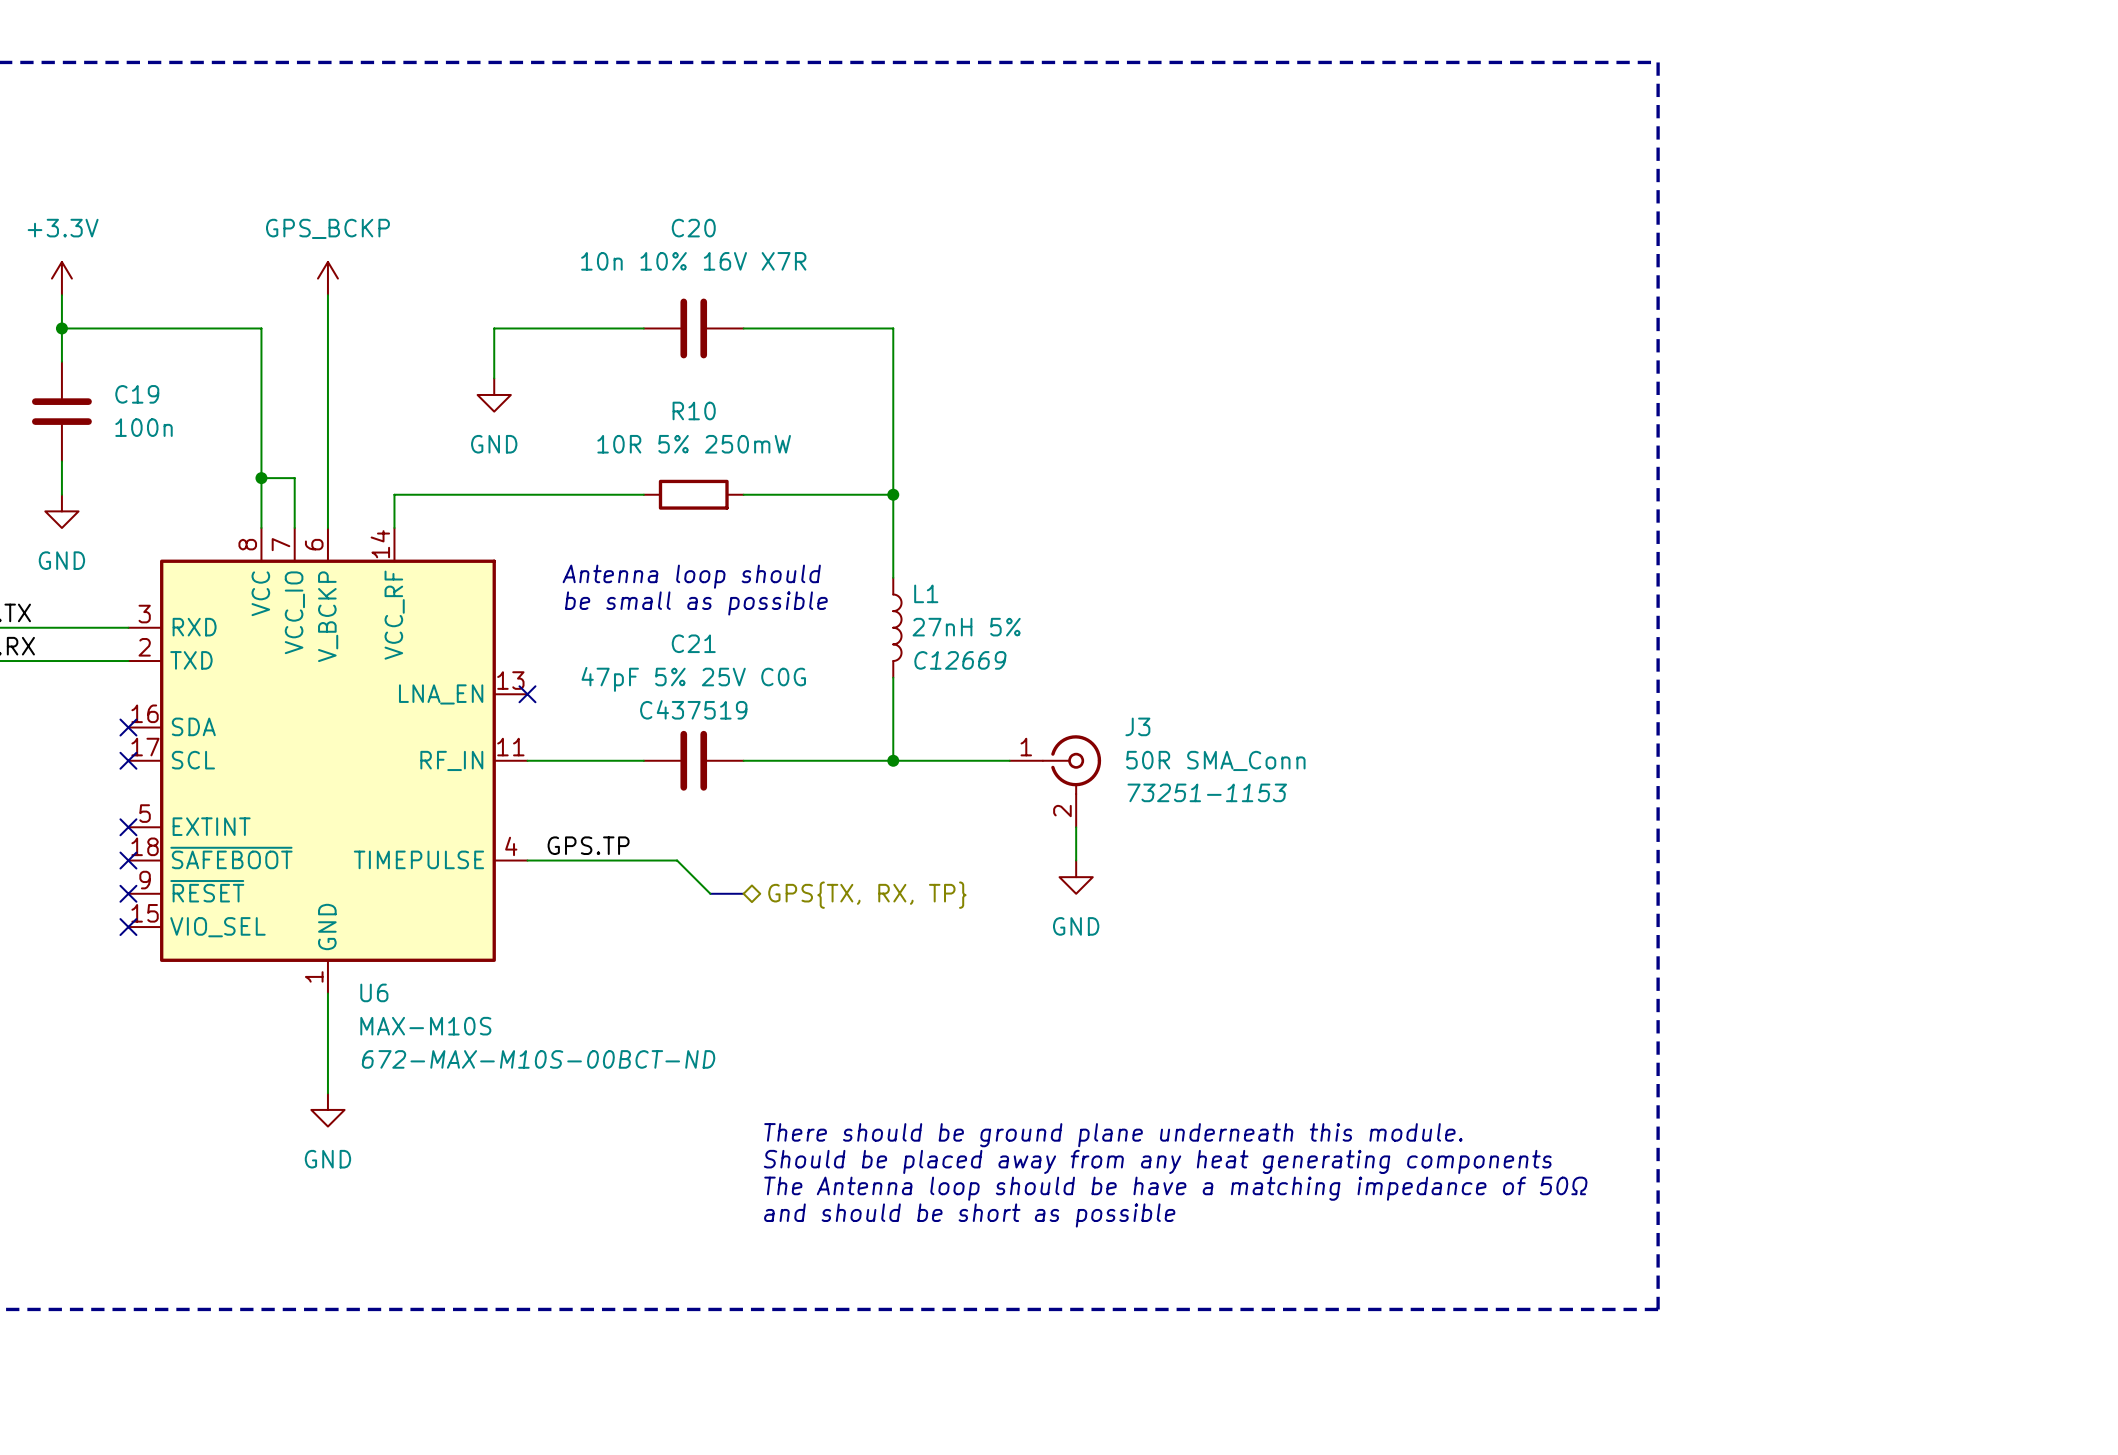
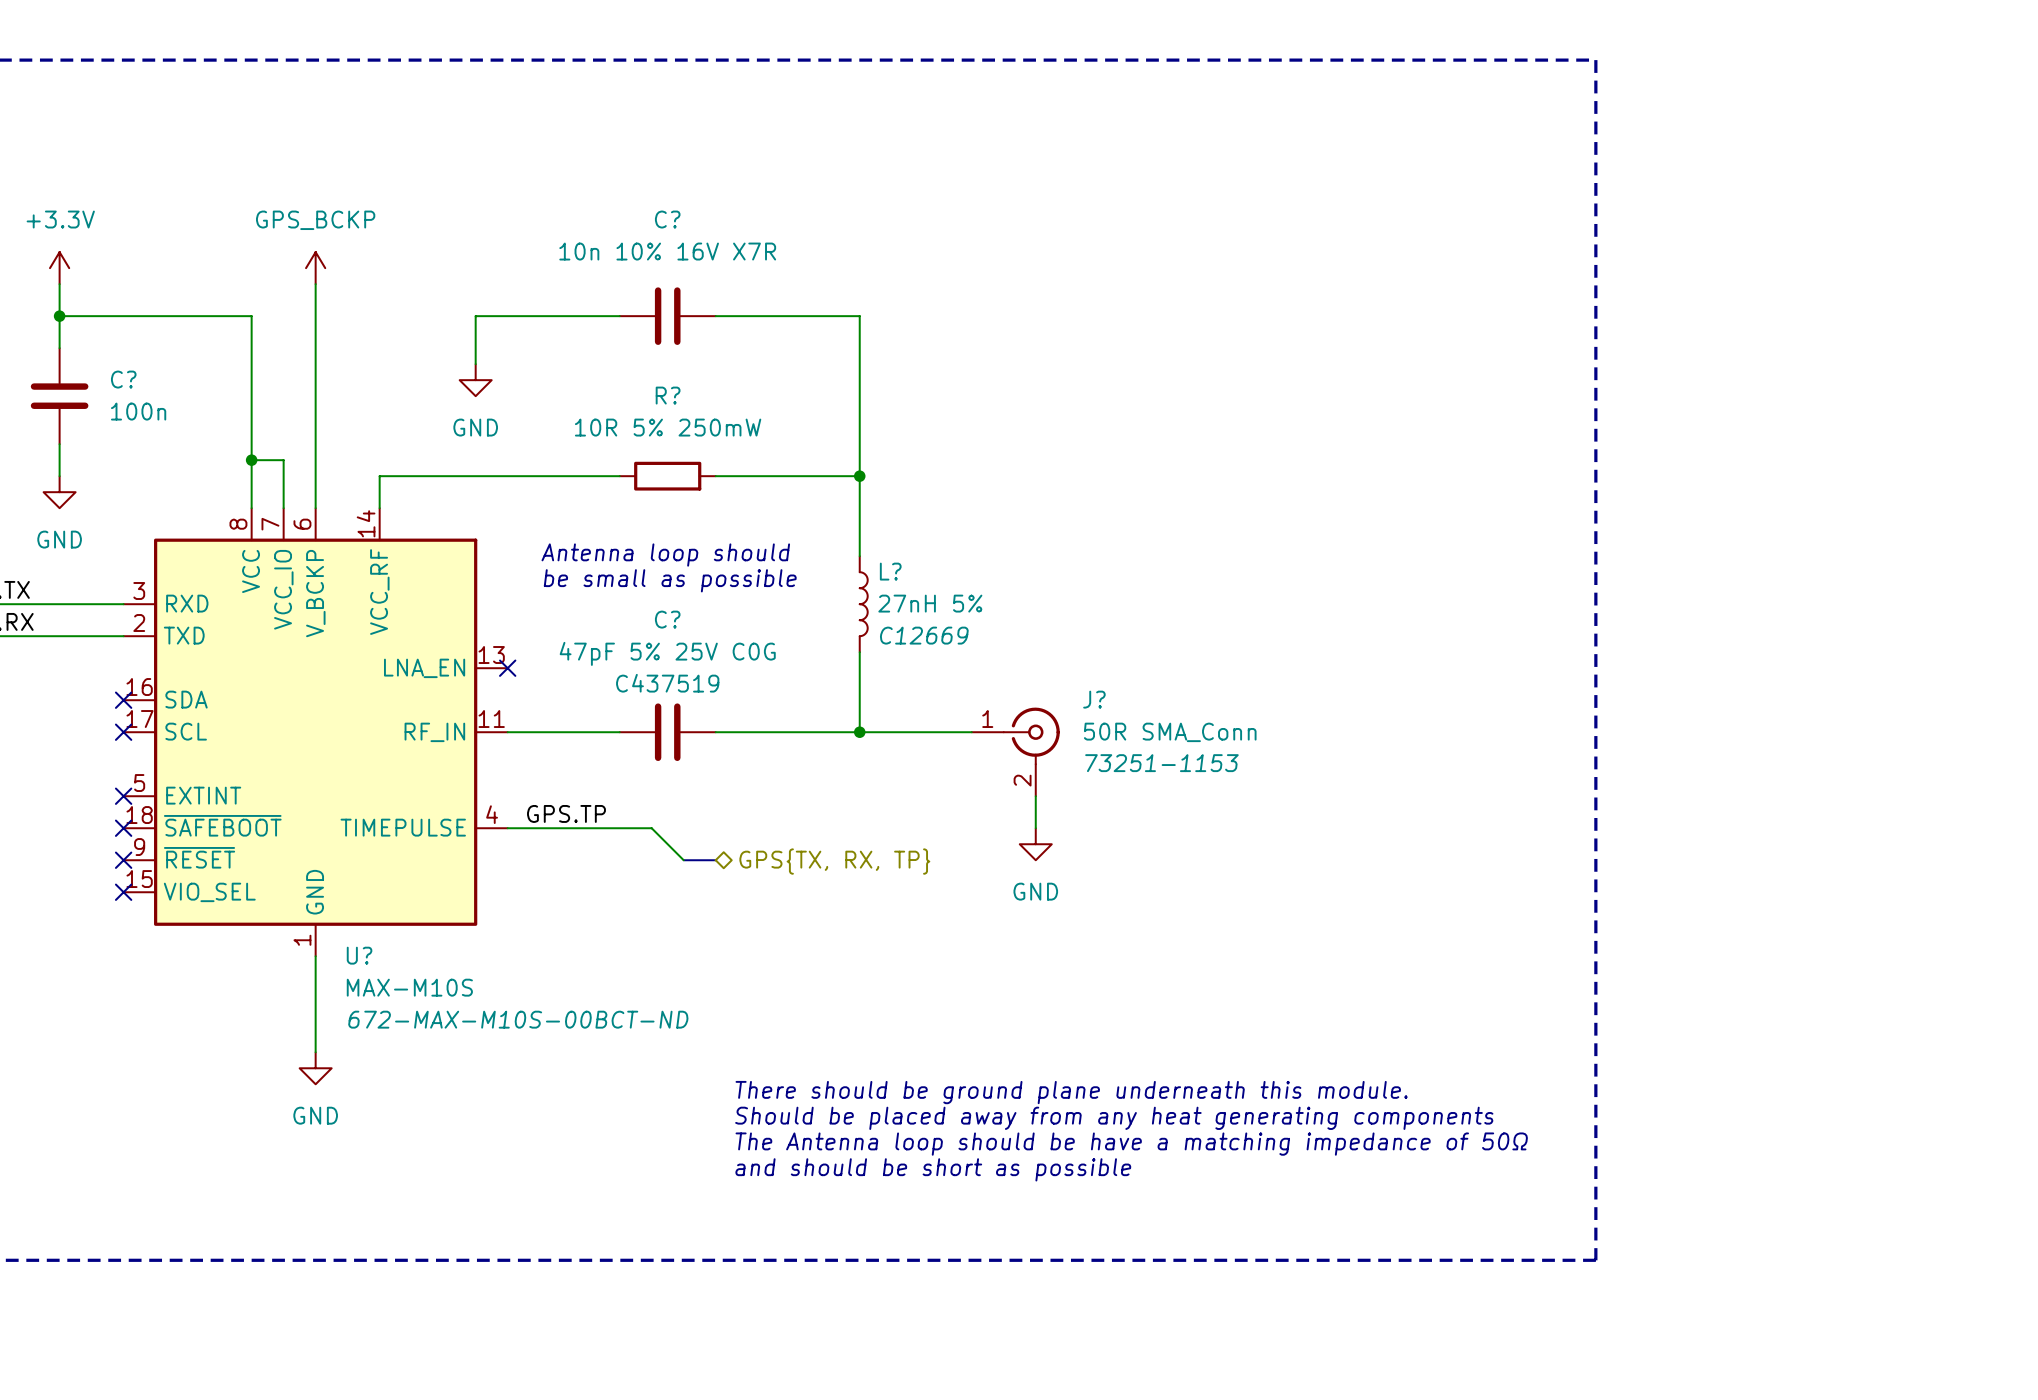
C20 name: C20 (693, 228) -> C? (667, 219)
C19 name: C19 (137, 394) -> C? (123, 379)
R10 name: R10 (694, 410) -> R? (668, 395)
L1 name: L1 (926, 593) -> L? (890, 571)
C21 name: C21 (693, 643) -> C? (667, 619)
J3 name: J3 (1137, 726) -> J? (1094, 699)
U6 name: U6 (374, 992) -> U? (359, 955)

